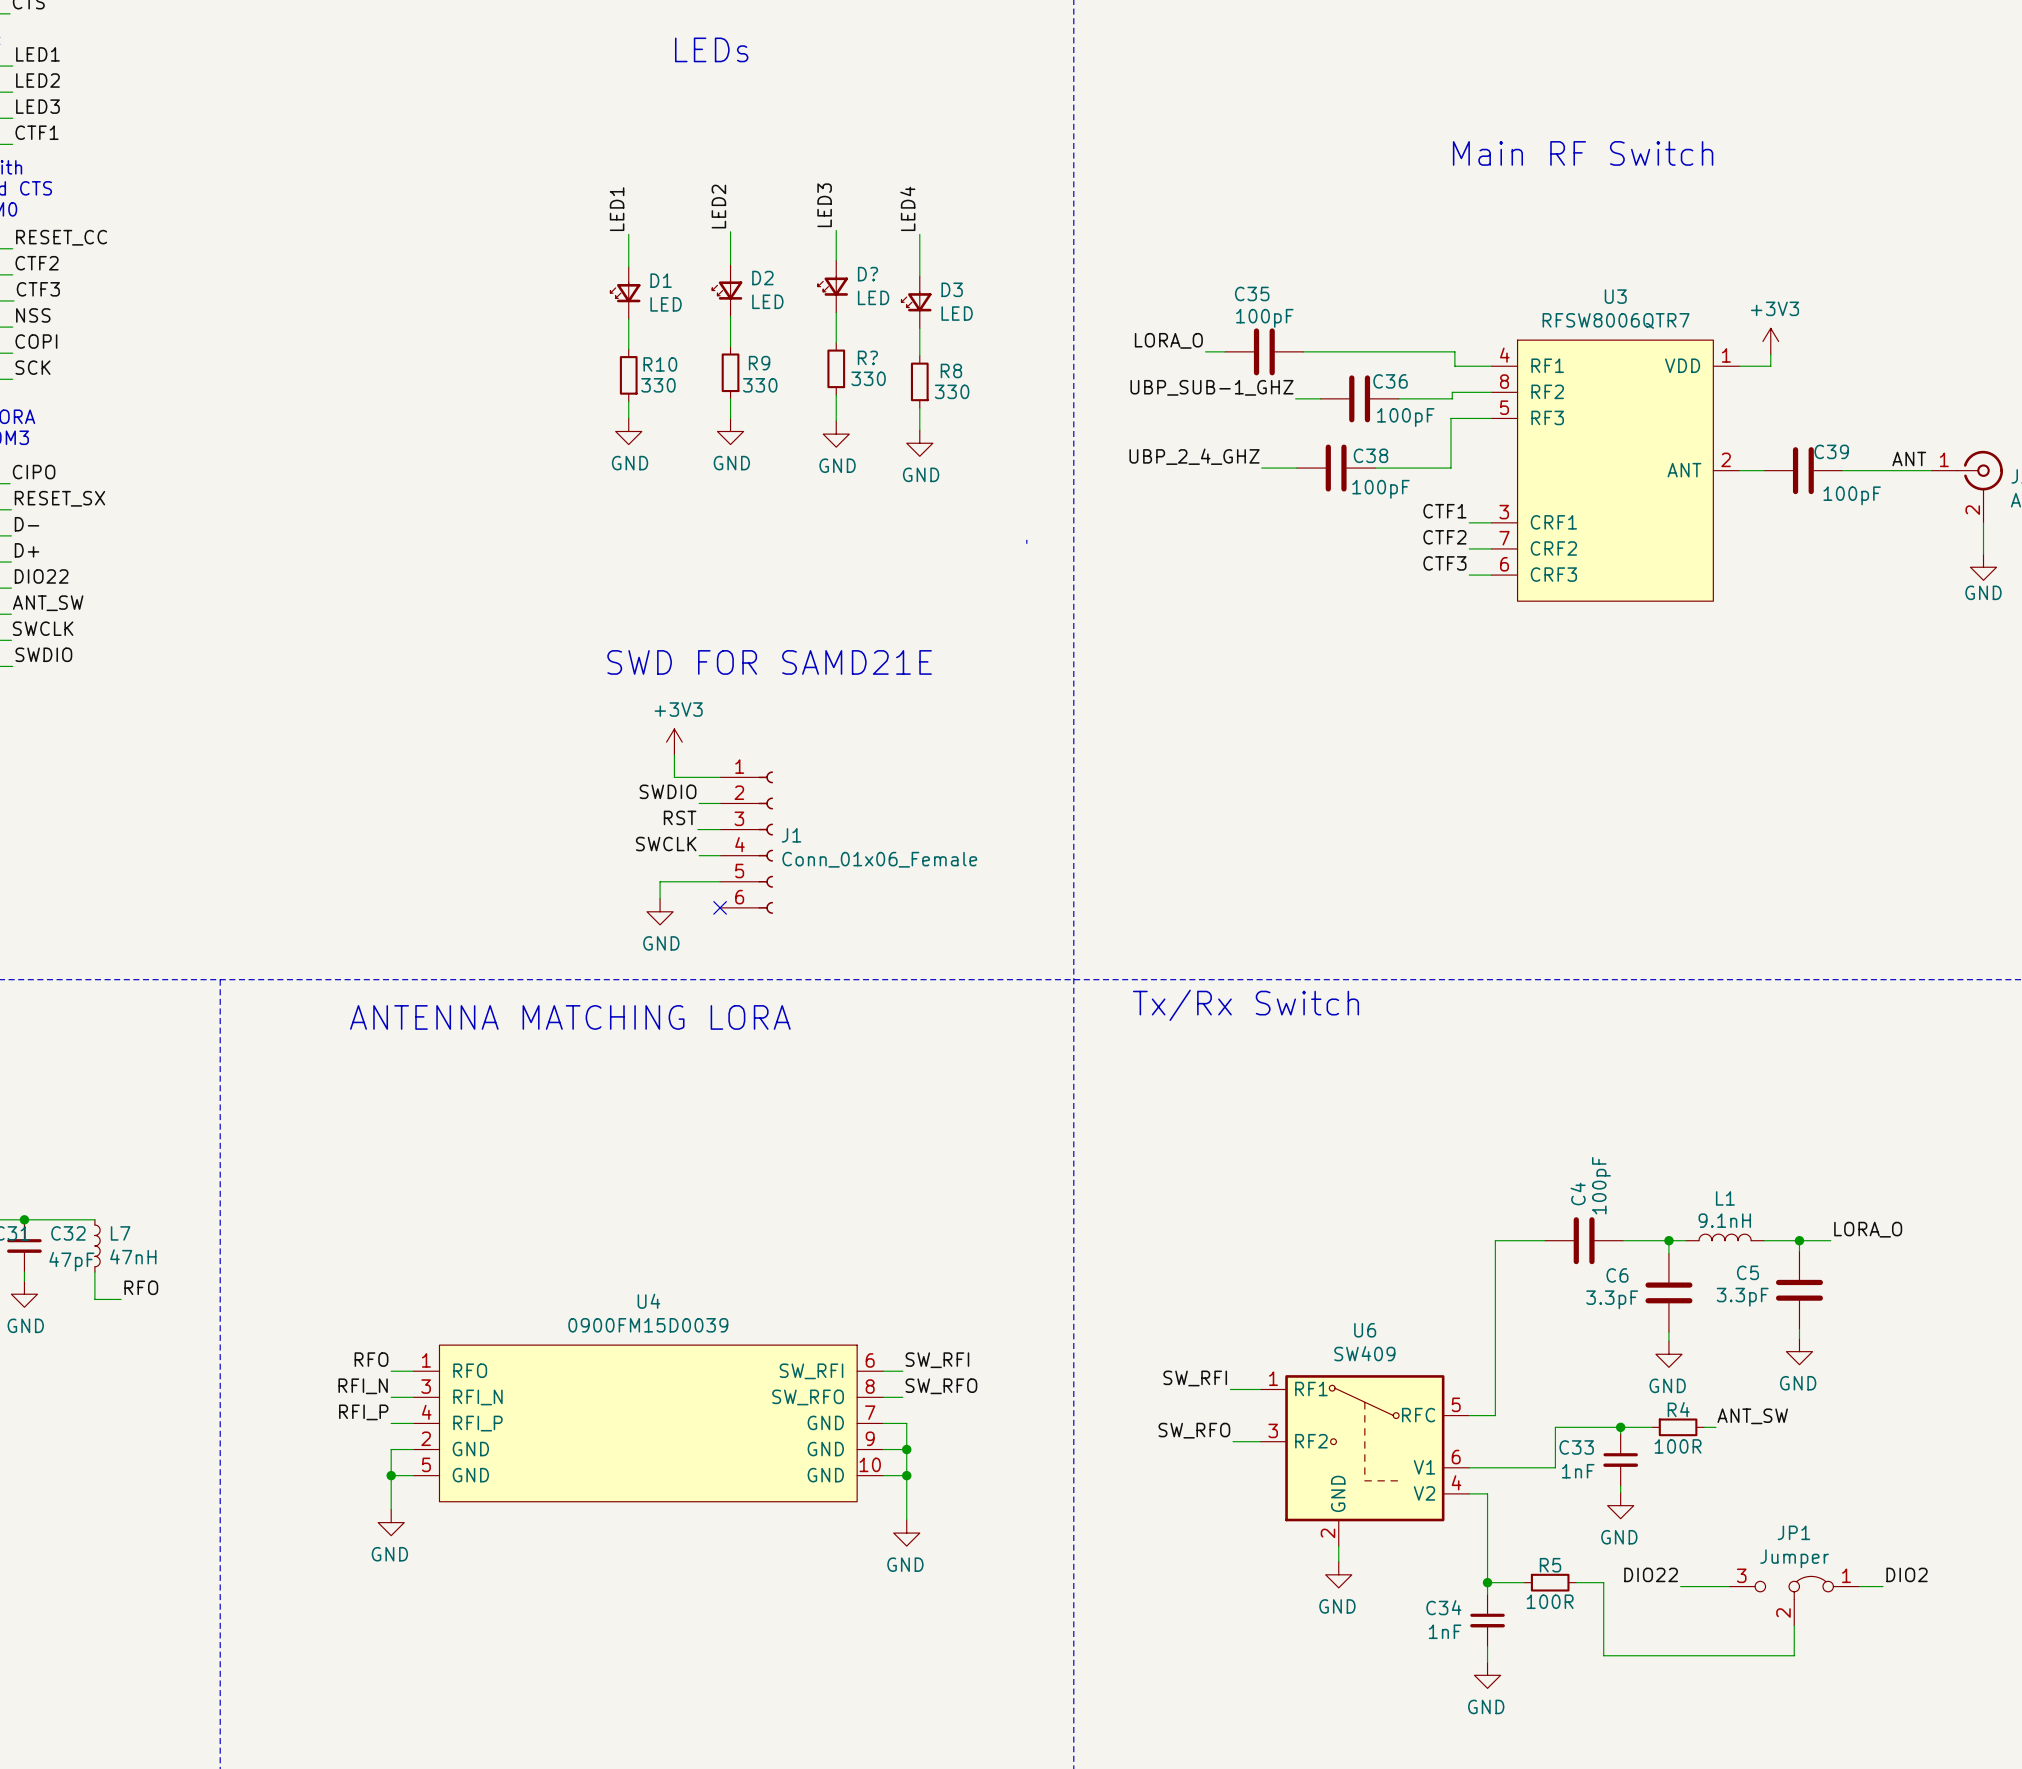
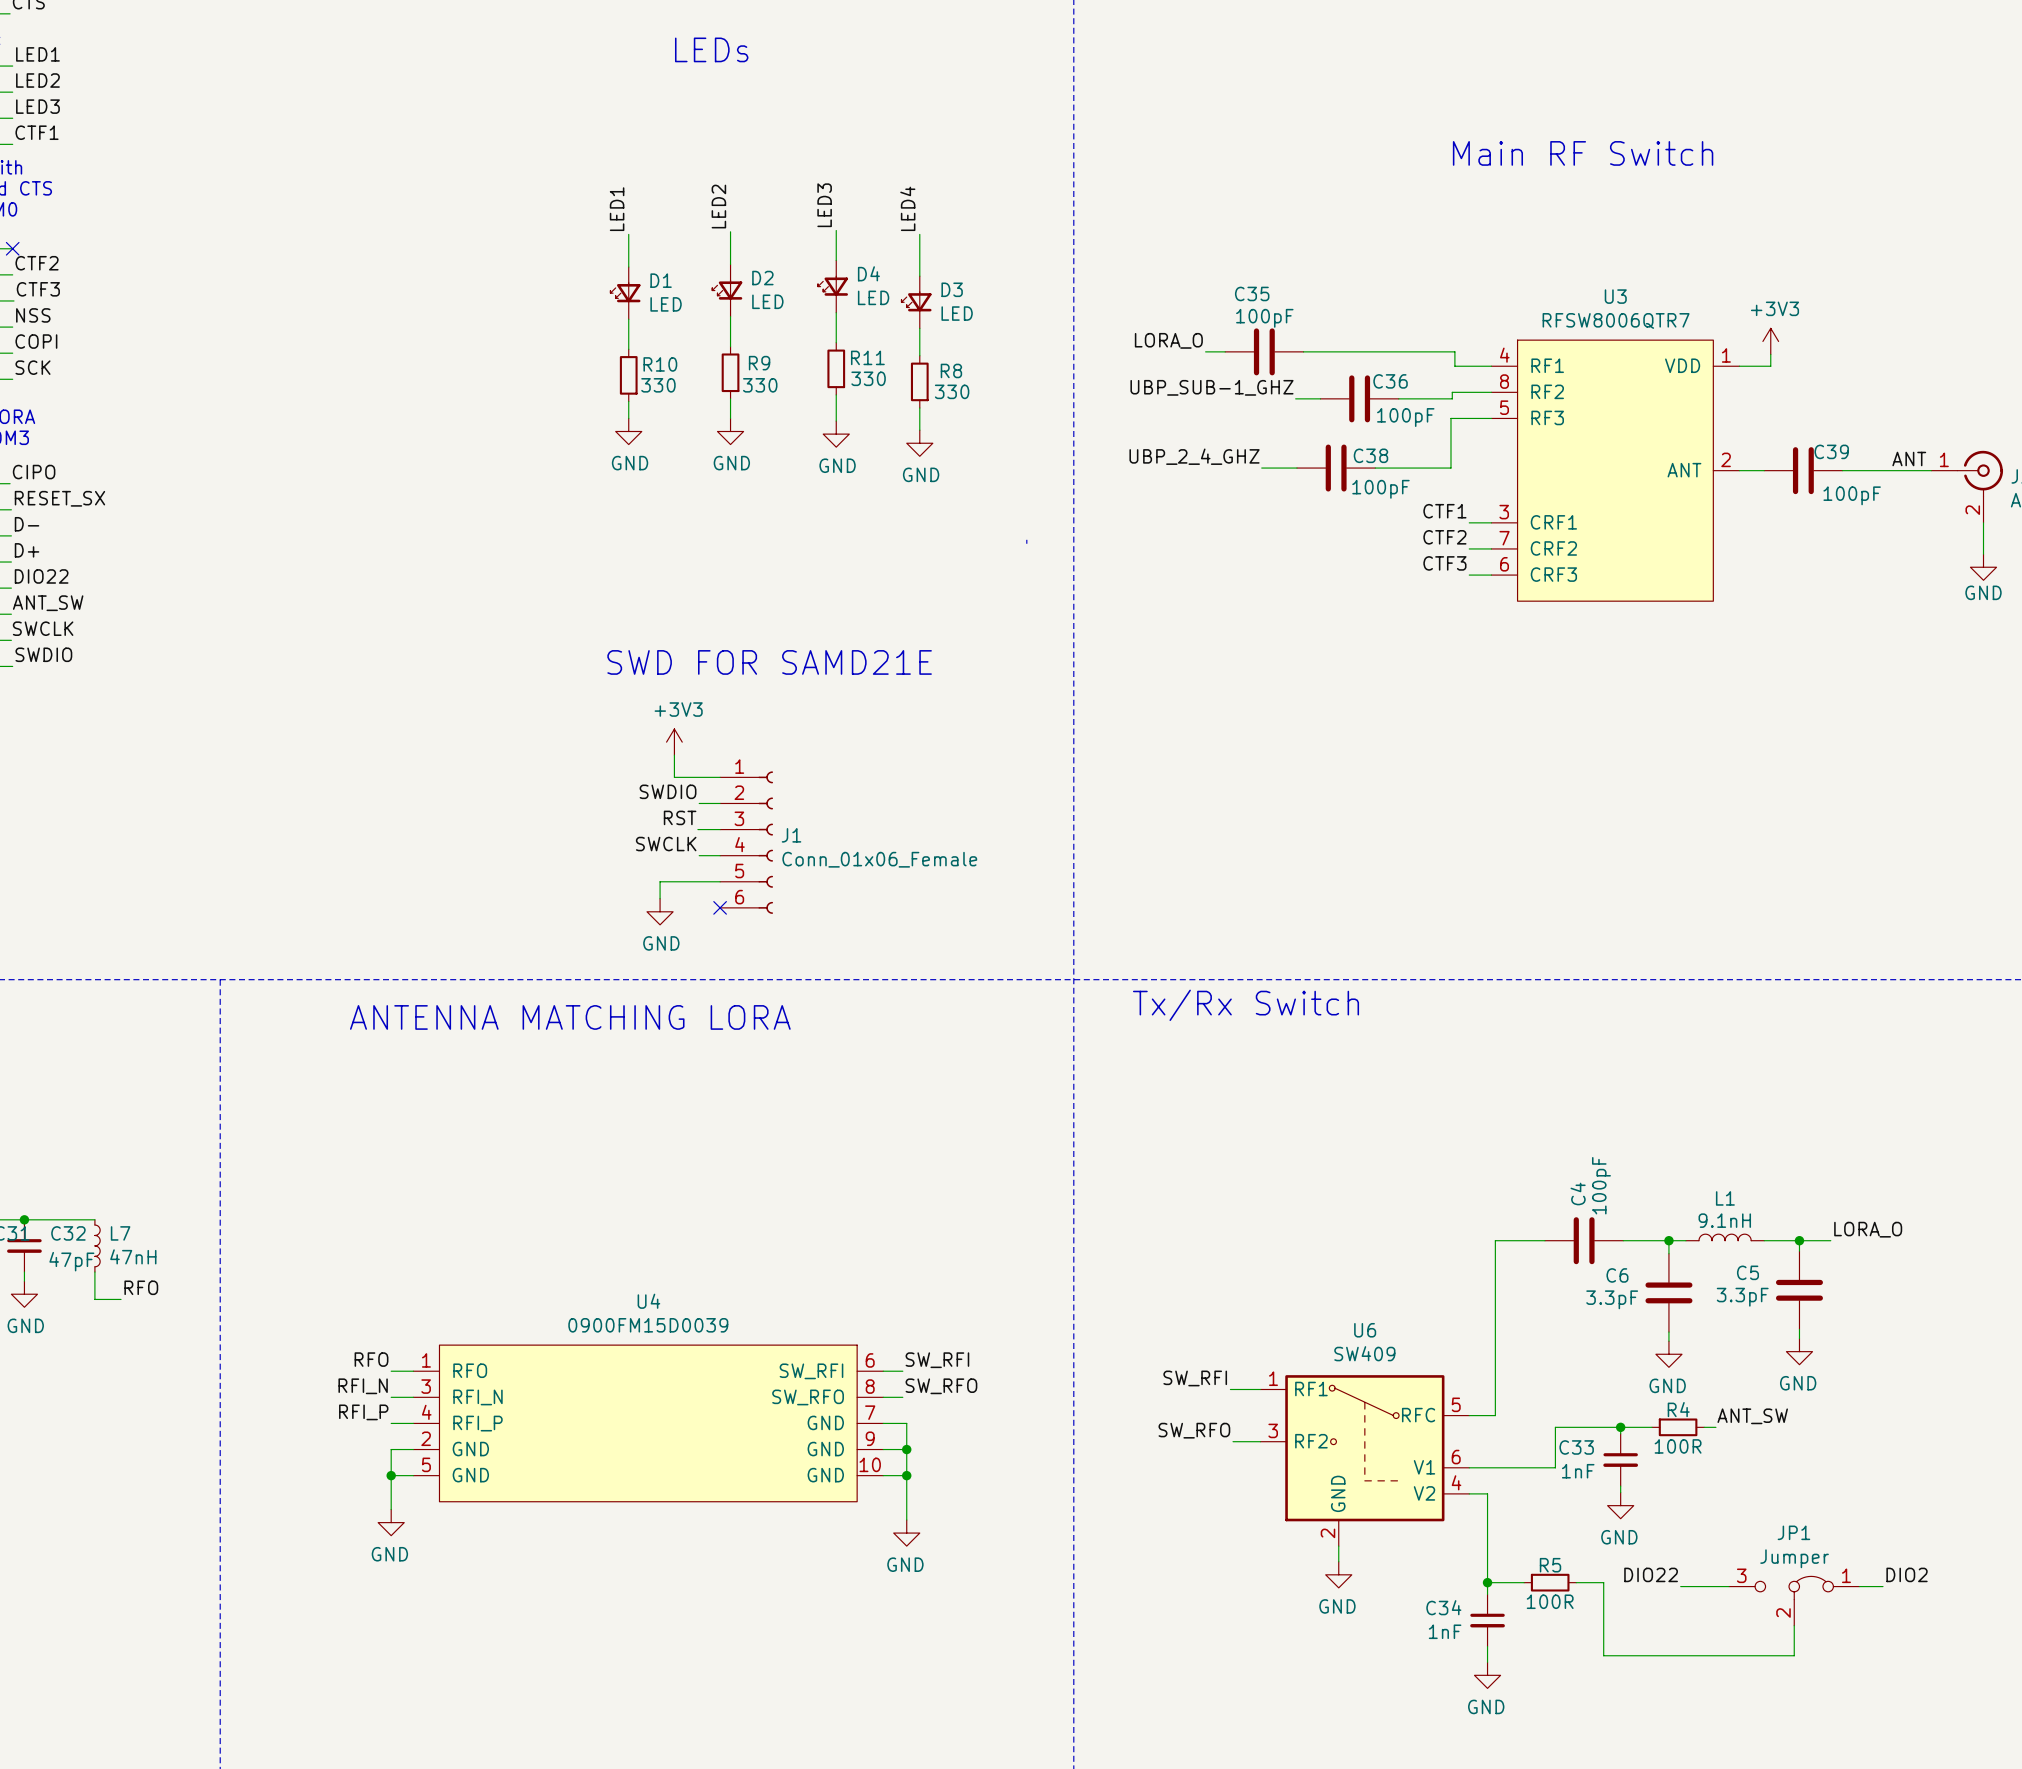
label: RESET_CC (61, 237) -> none
no-connect mark: none -> (12, 248)
D? name: D? (867, 274) -> D4 (868, 273)
R? name: R? (867, 357) -> R11 (867, 357)

